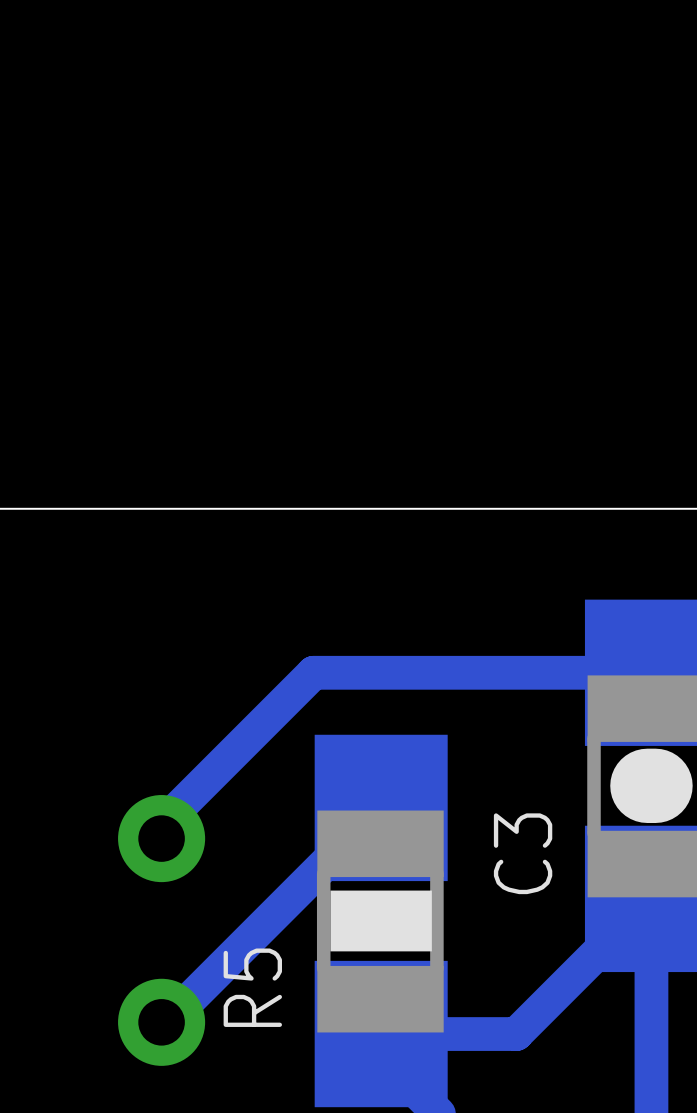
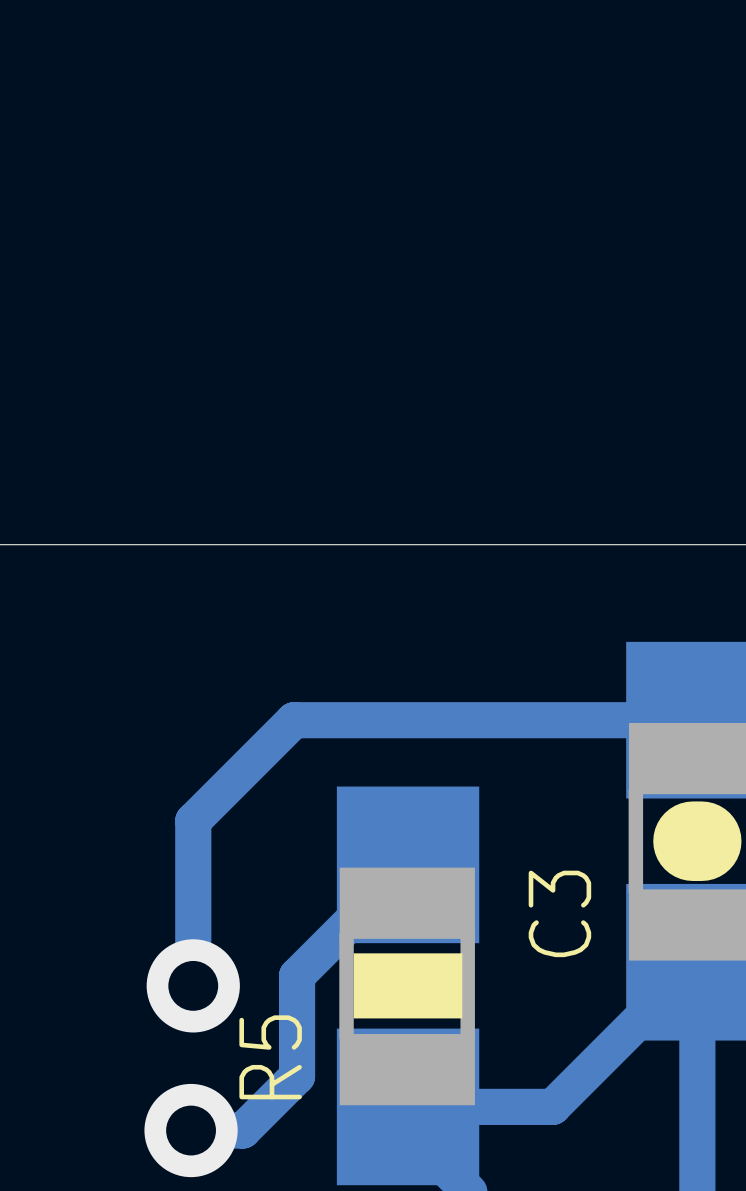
track: (313, 672) (161, 824) (161, 838) -> (335, 720) (294, 720) (193, 820) (193, 985)
via position: (161, 838) -> (193, 985)
track: (277, 911) (166, 1022) (161, 1022) -> (297, 975) (297, 1076) (242, 1130) (191, 1130)
via position: (161, 1022) -> (191, 1130)

